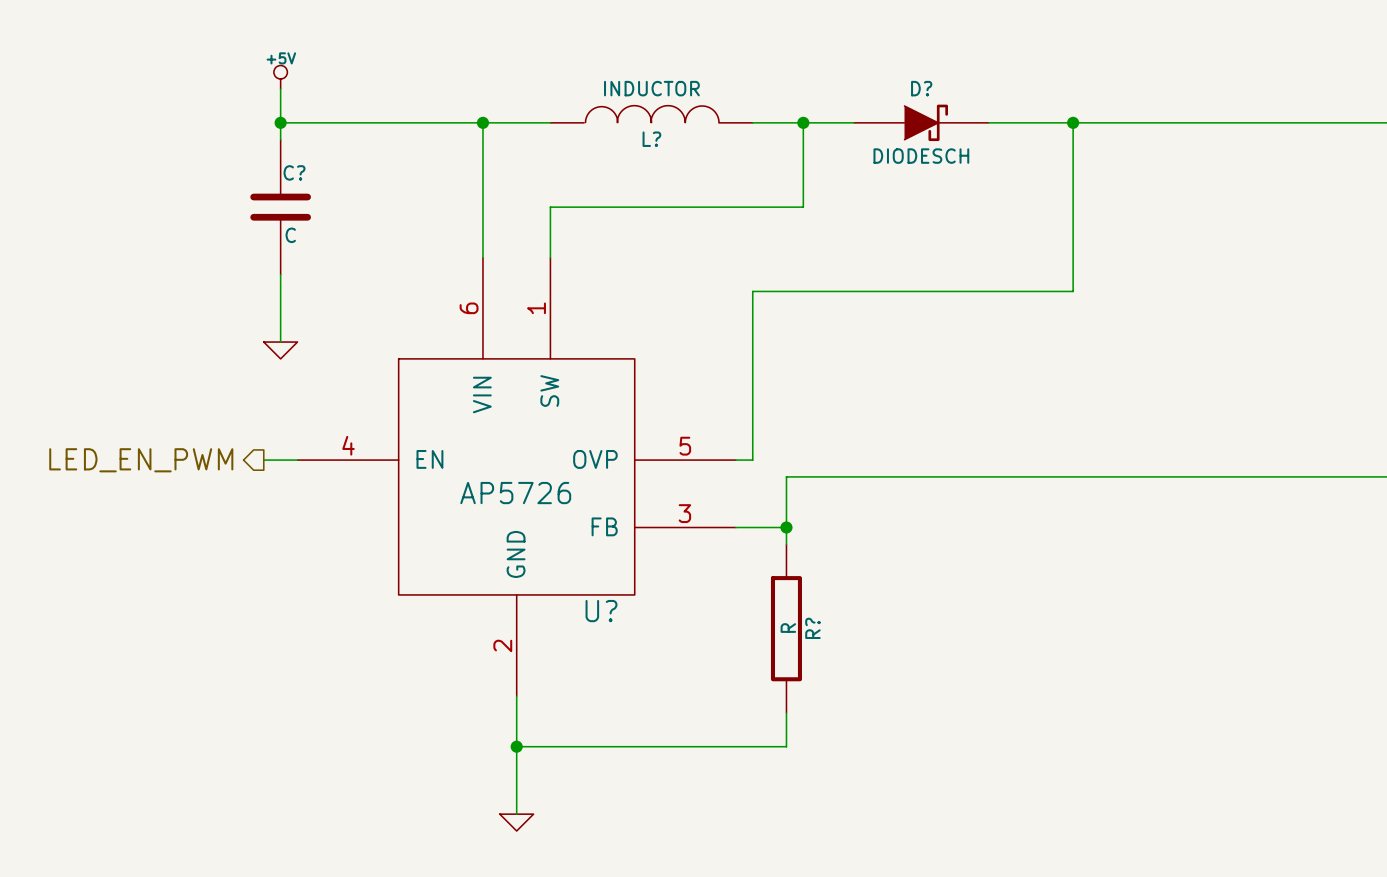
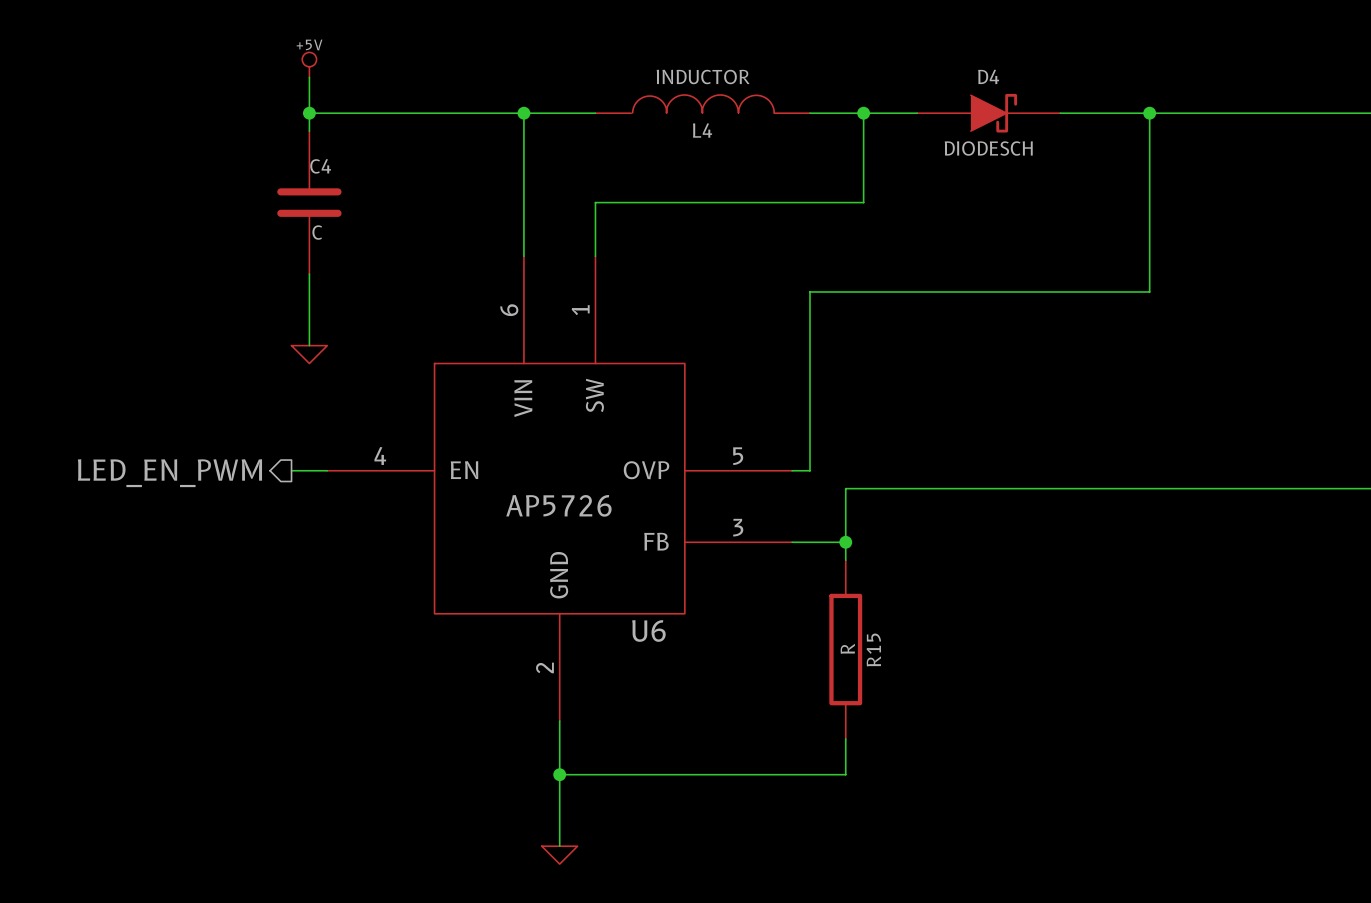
D? name: D? (921, 88) -> D4 (988, 76)
L? name: L? (651, 139) -> L4 (702, 130)
C? name: C? (294, 172) -> C4 (320, 166)
U? name: U? (601, 611) -> U6 (648, 630)
R? name: R? (812, 628) -> R15 (873, 650)

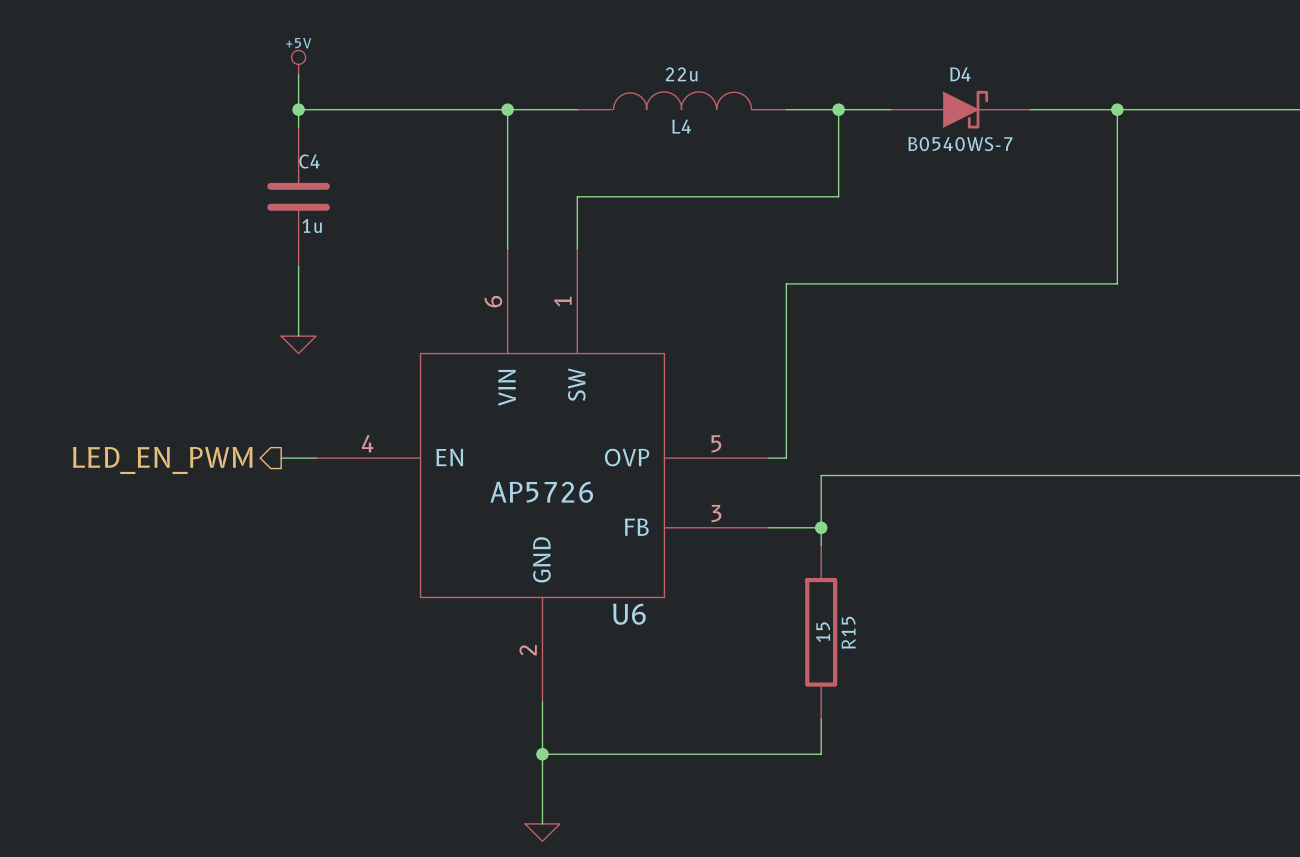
L4 value: INDUCTOR (703, 76) -> 22u (681, 74)
D4 value: DIODESCH (988, 148) -> B0540WS-7 (960, 144)
C4 value: C (317, 232) -> 1u (312, 225)
R15 value: R (847, 648) -> 15 (823, 632)

